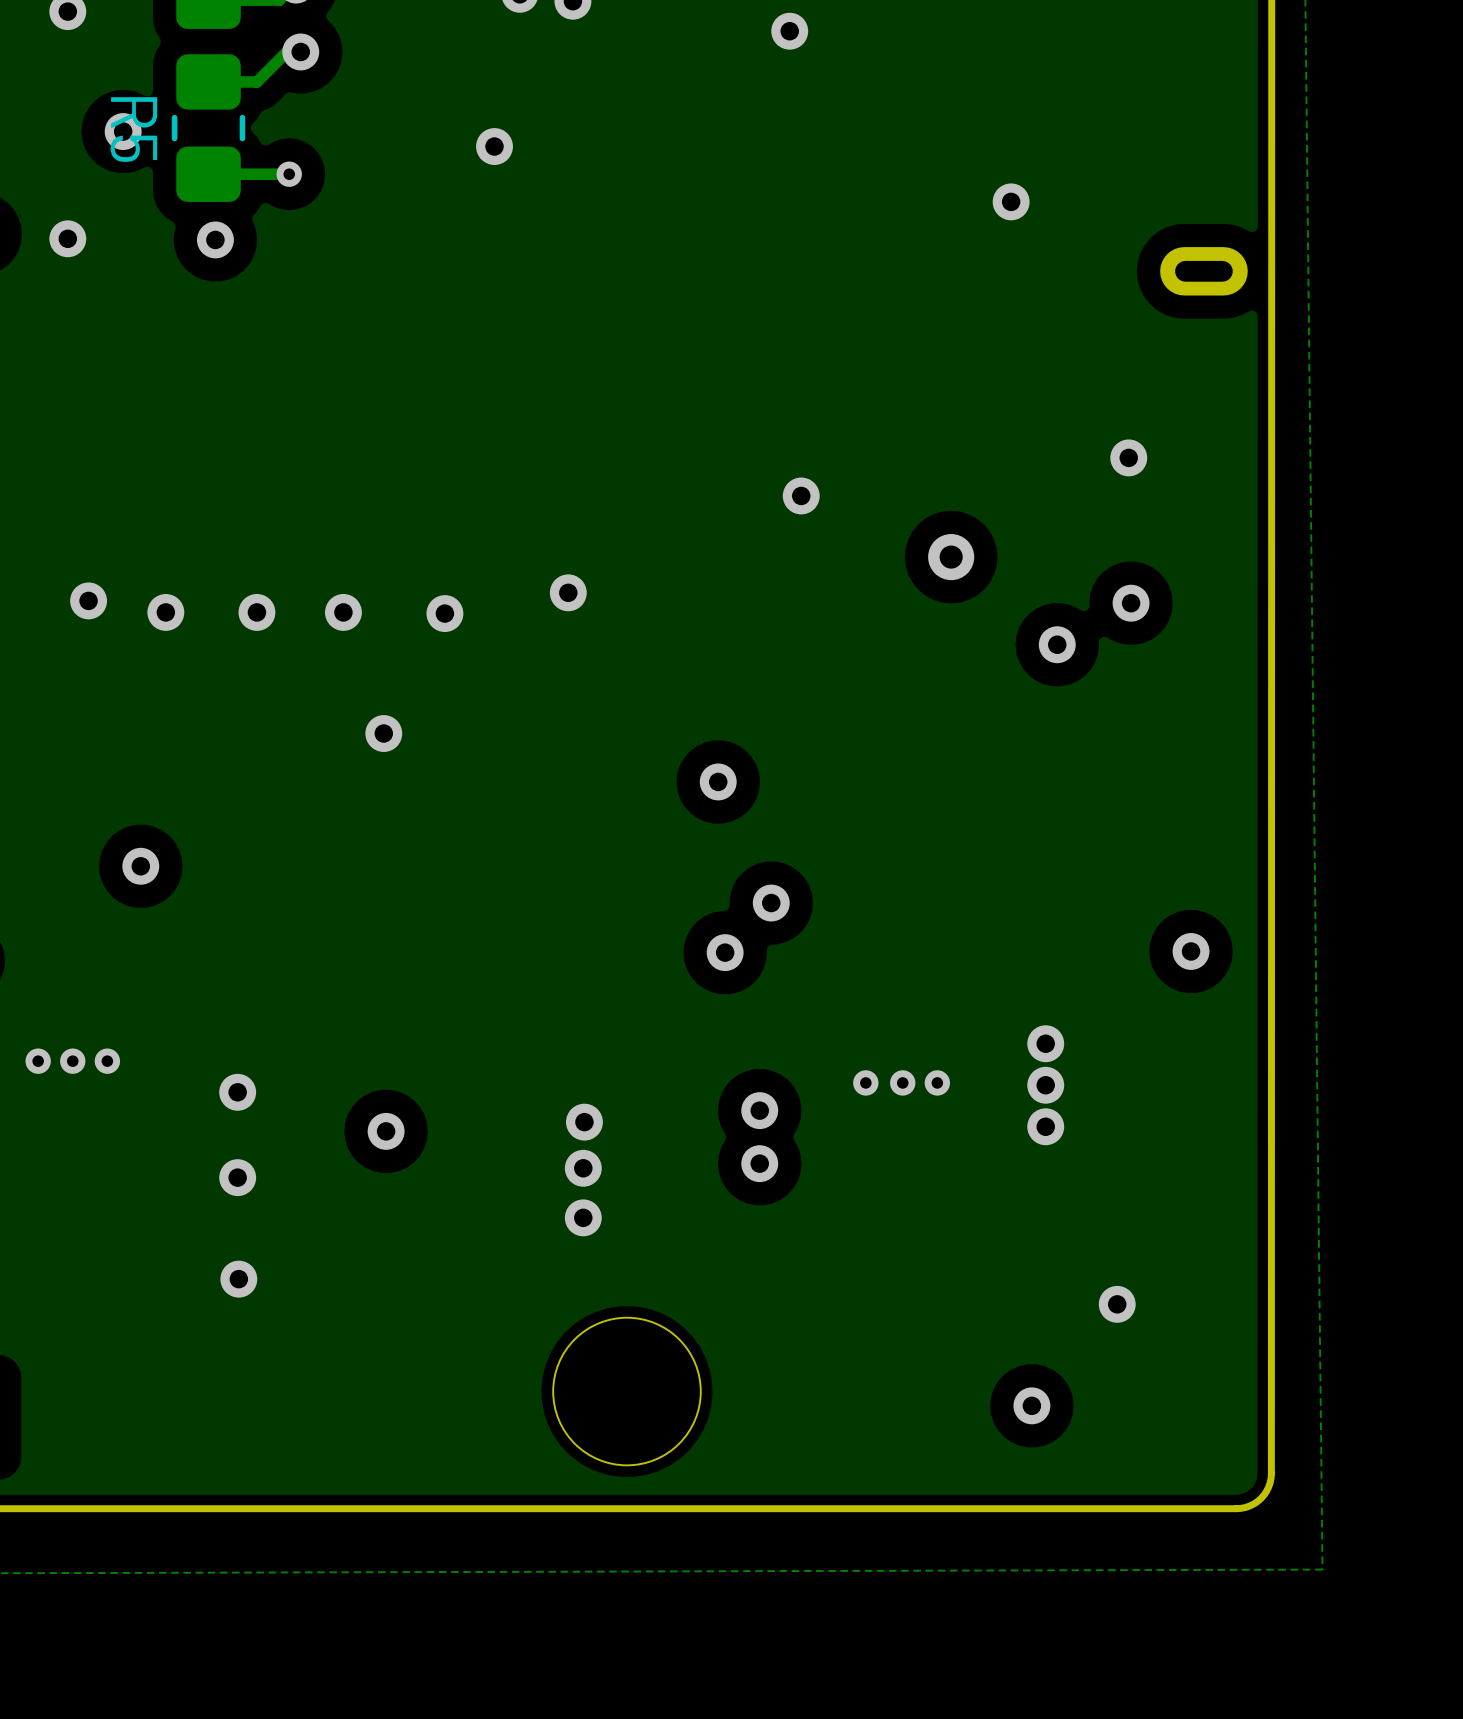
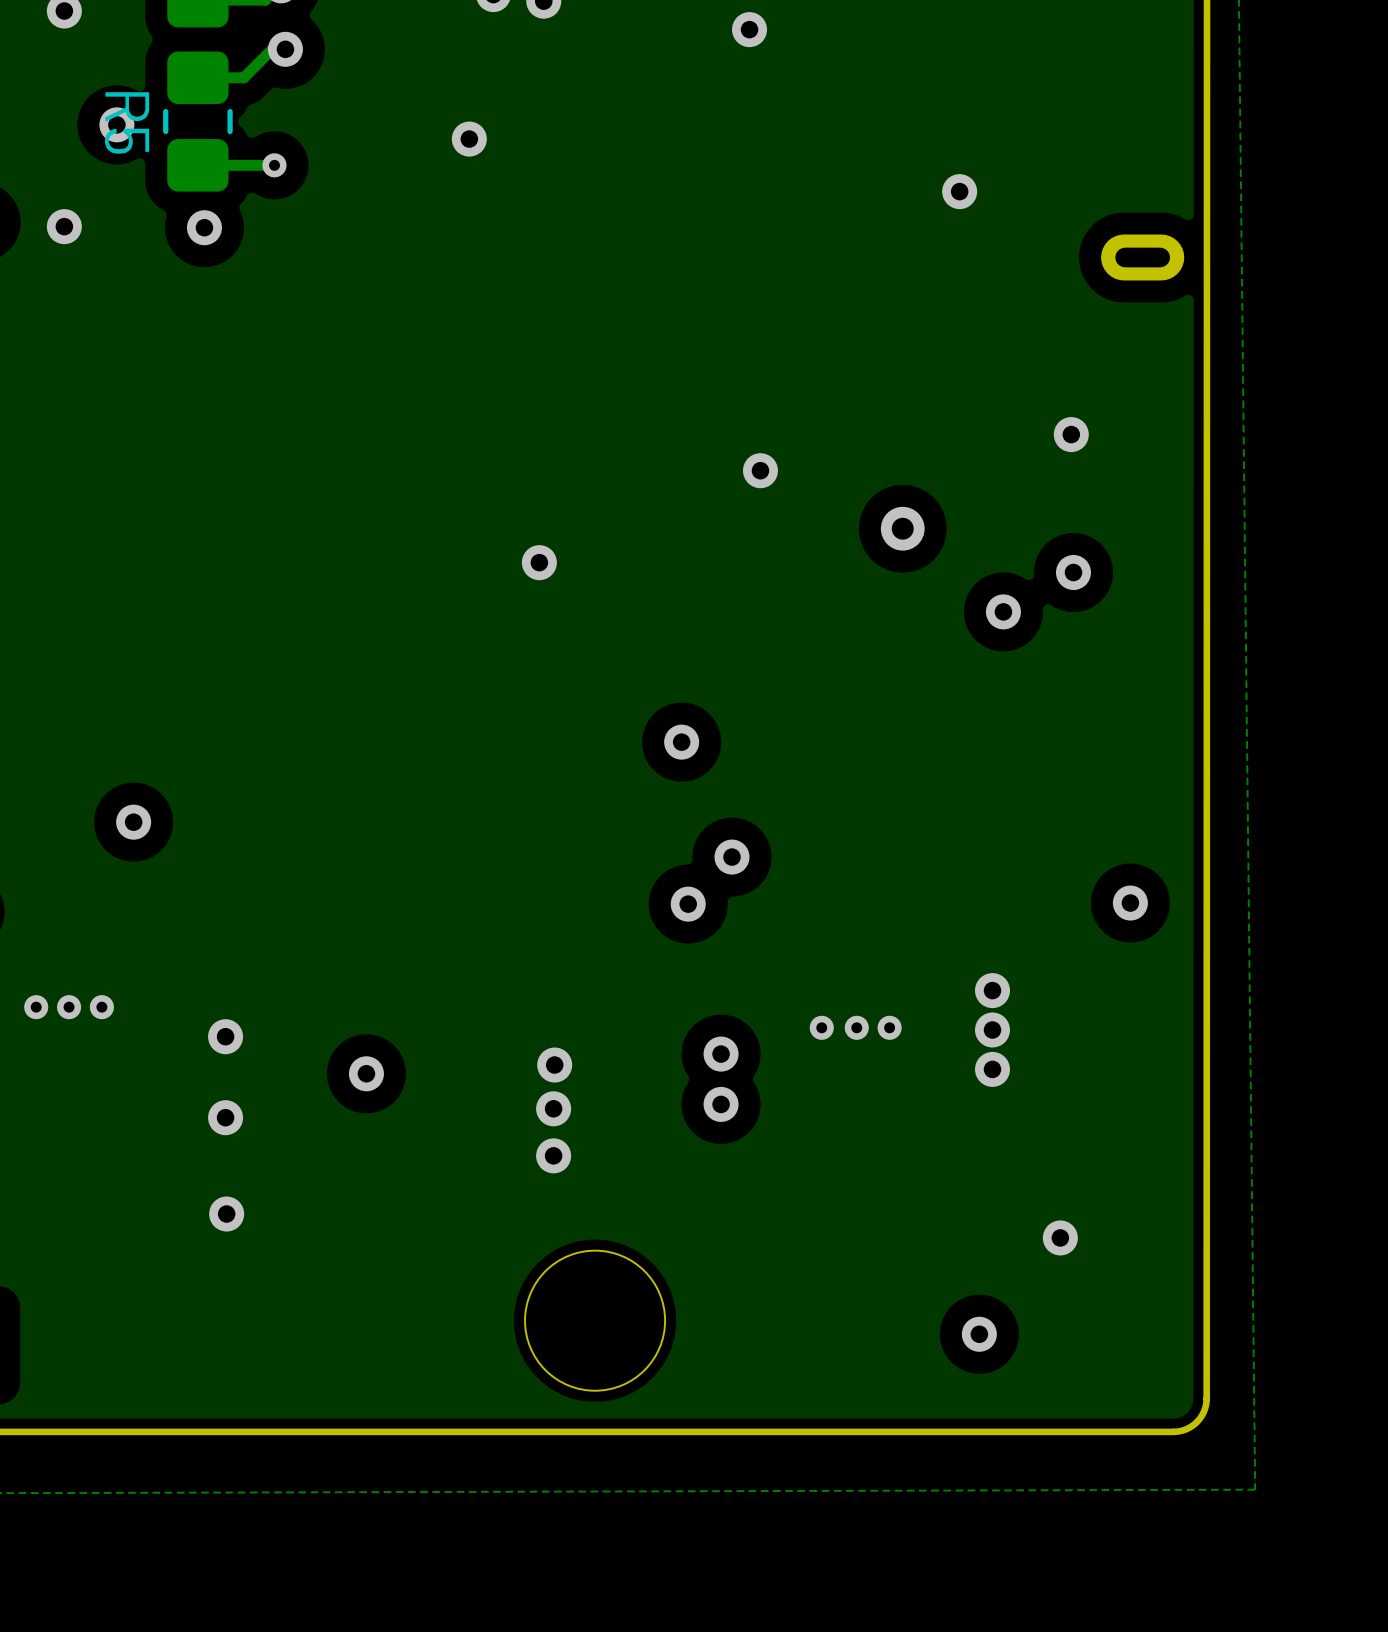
via: (88, 600) -> none
via: (165, 612) -> none
via: (256, 612) -> none
via: (343, 612) -> none
via: (444, 613) -> none
via: (383, 733) -> none

